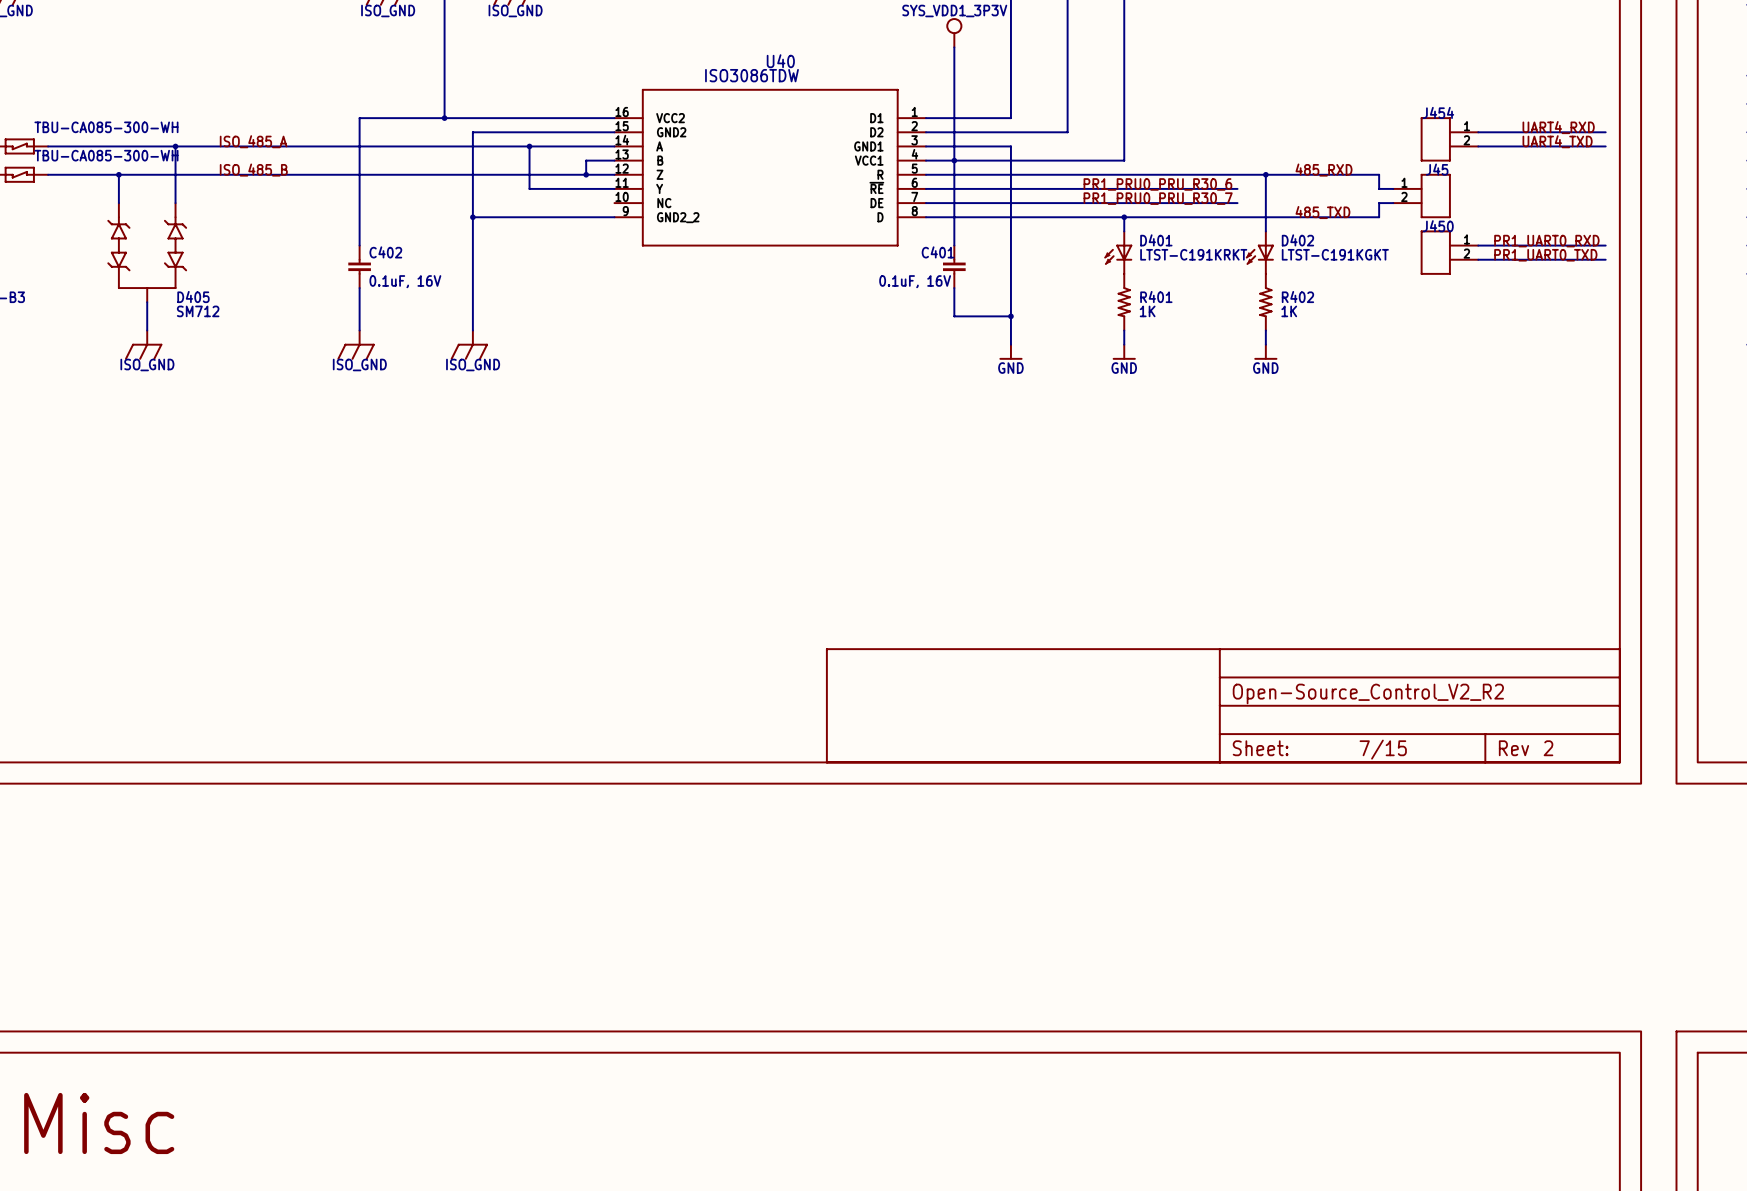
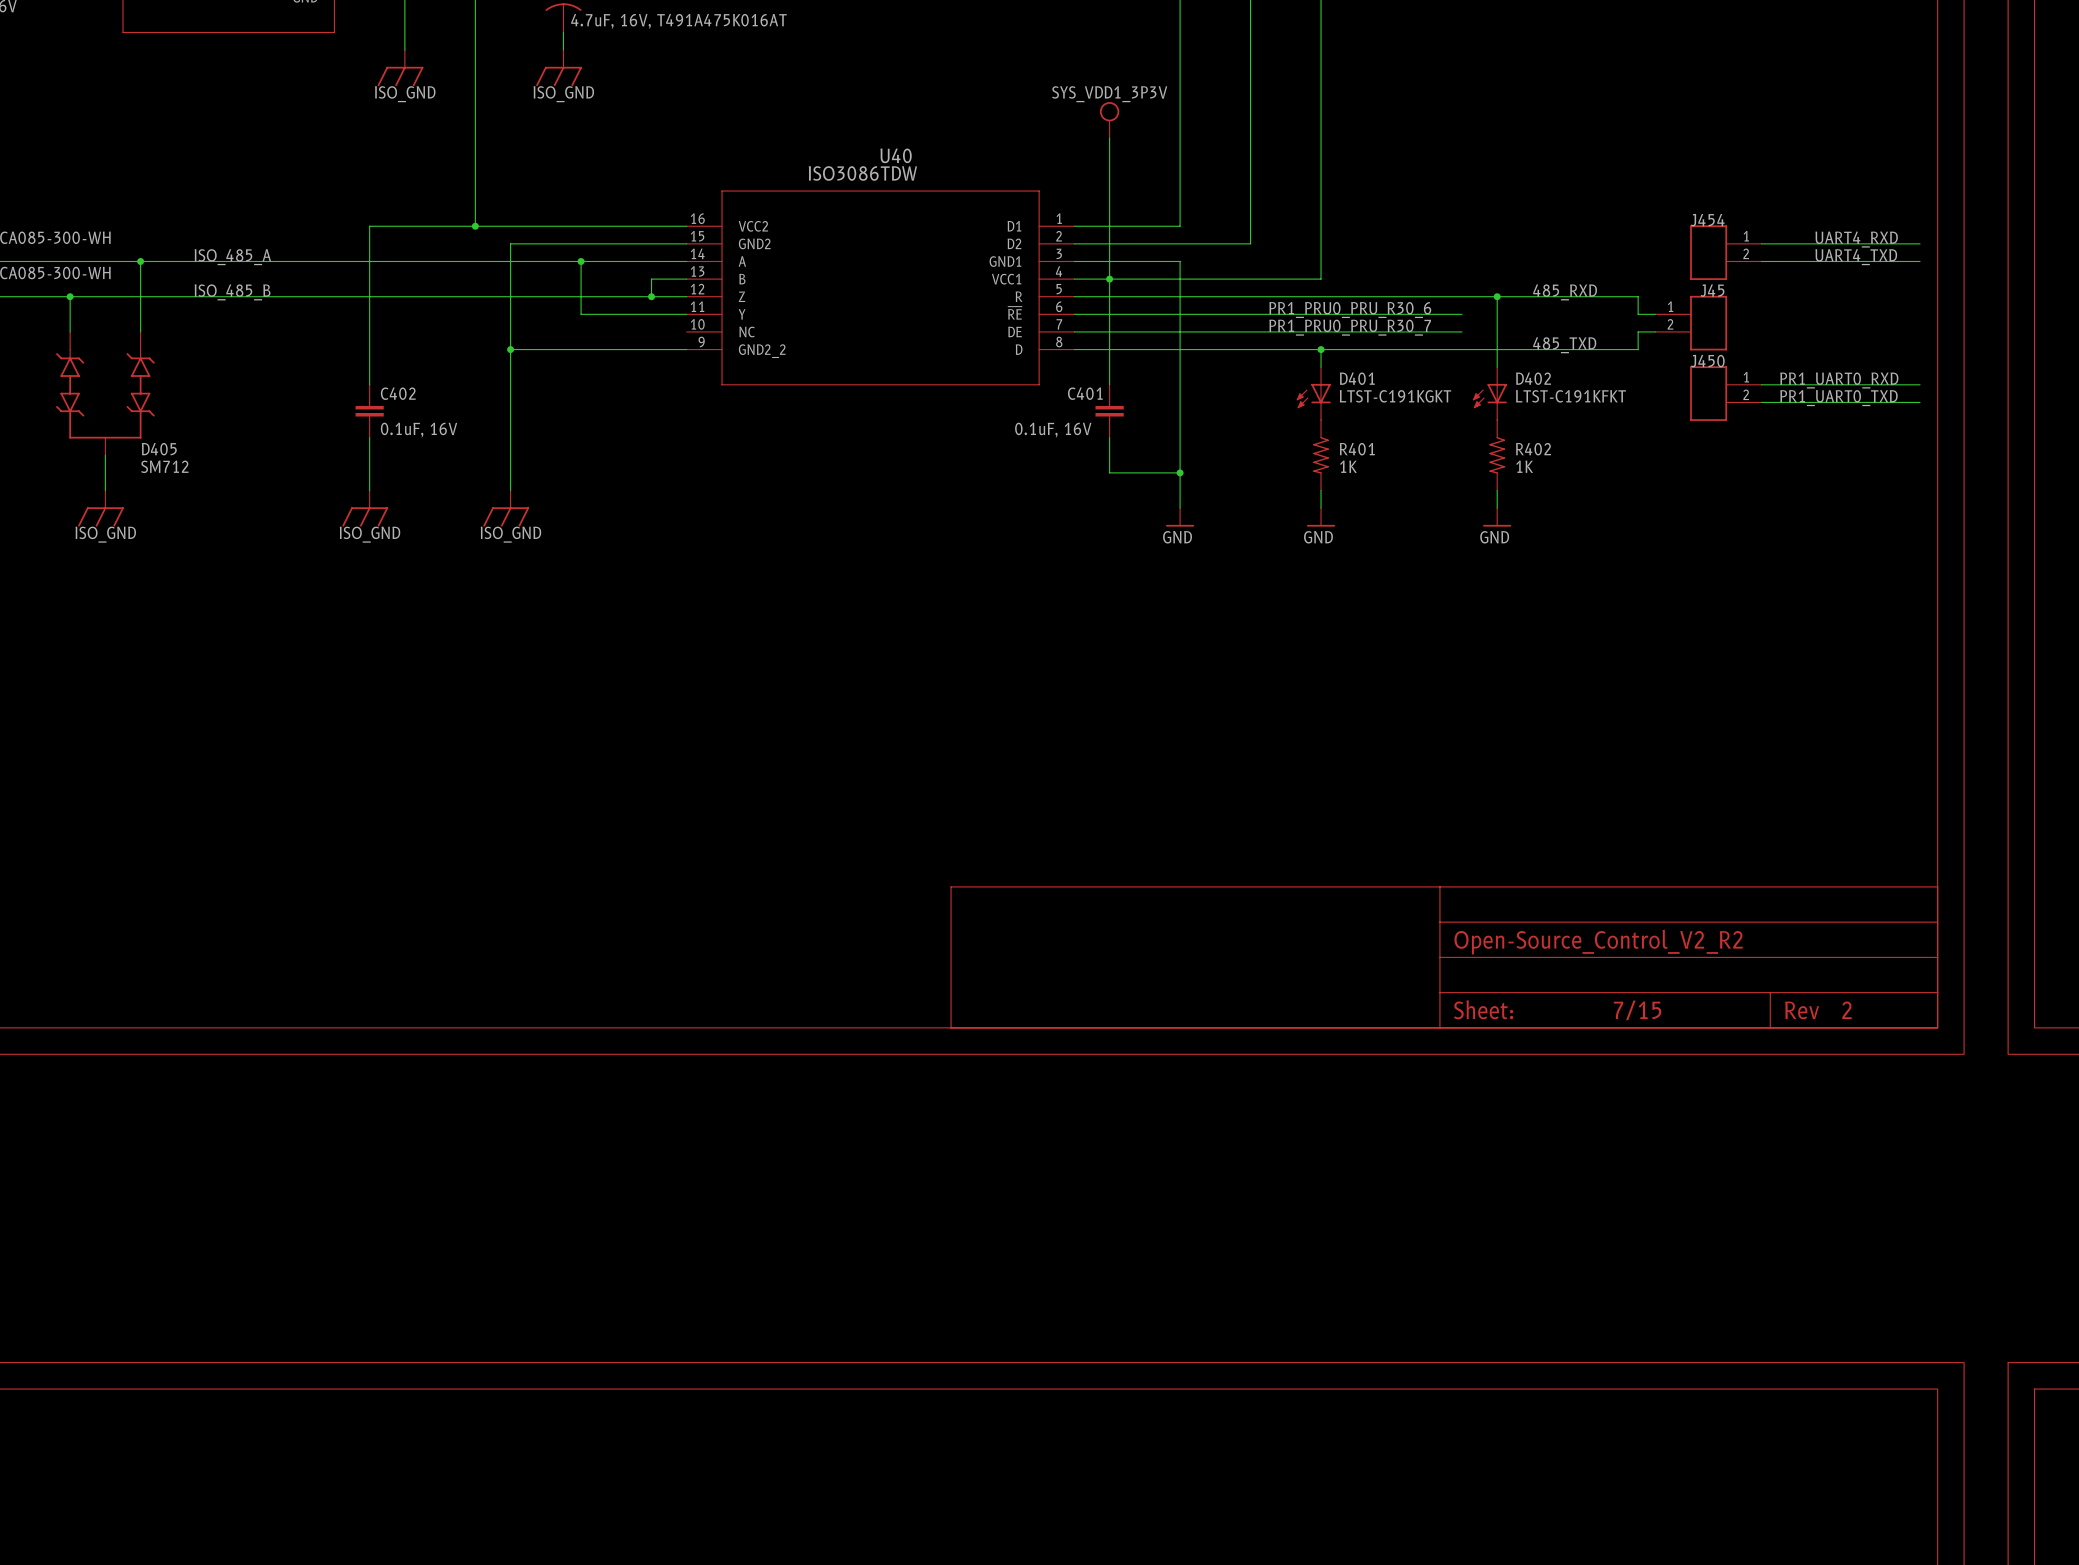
D401 value: LTST-C191KRKT (1193, 254) -> LTST-C191KGKT (1395, 396)
D402 value: LTST-C191KGKT (1335, 254) -> LTST-C191KFKT (1570, 396)

